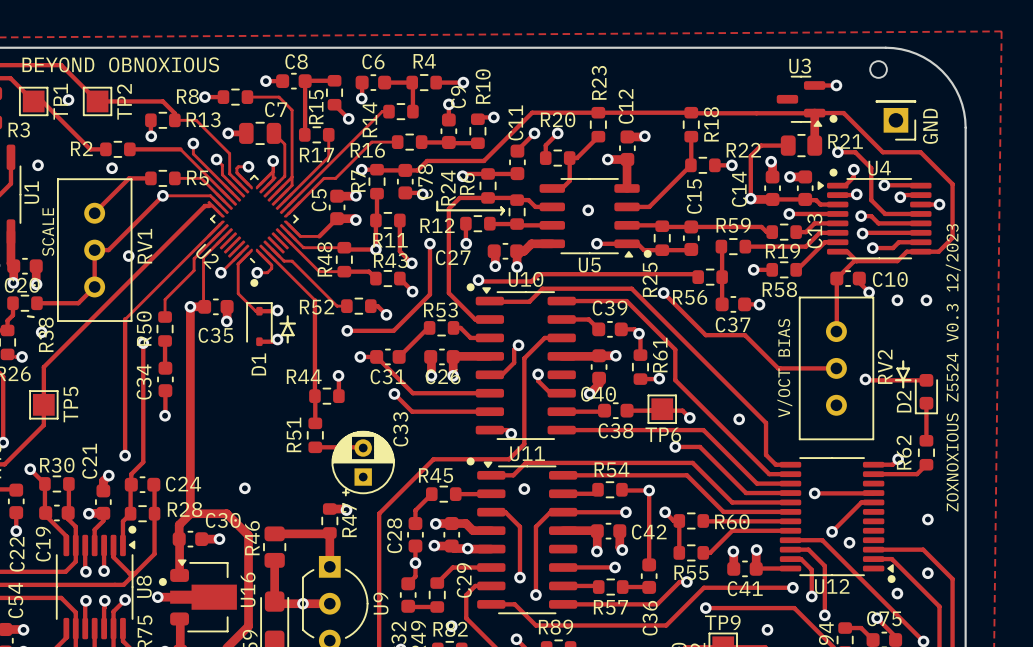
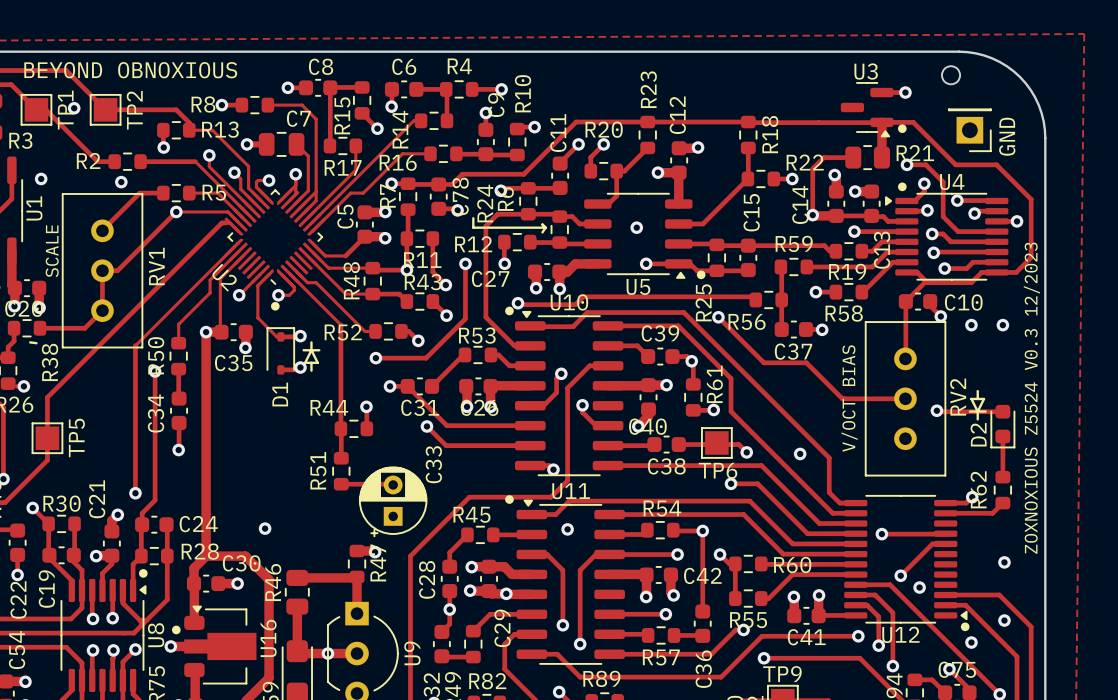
via: (128, 256) -> none
via: (41, 332) -> none
via: (451, 626) -> none
via: (767, 629) -> none

